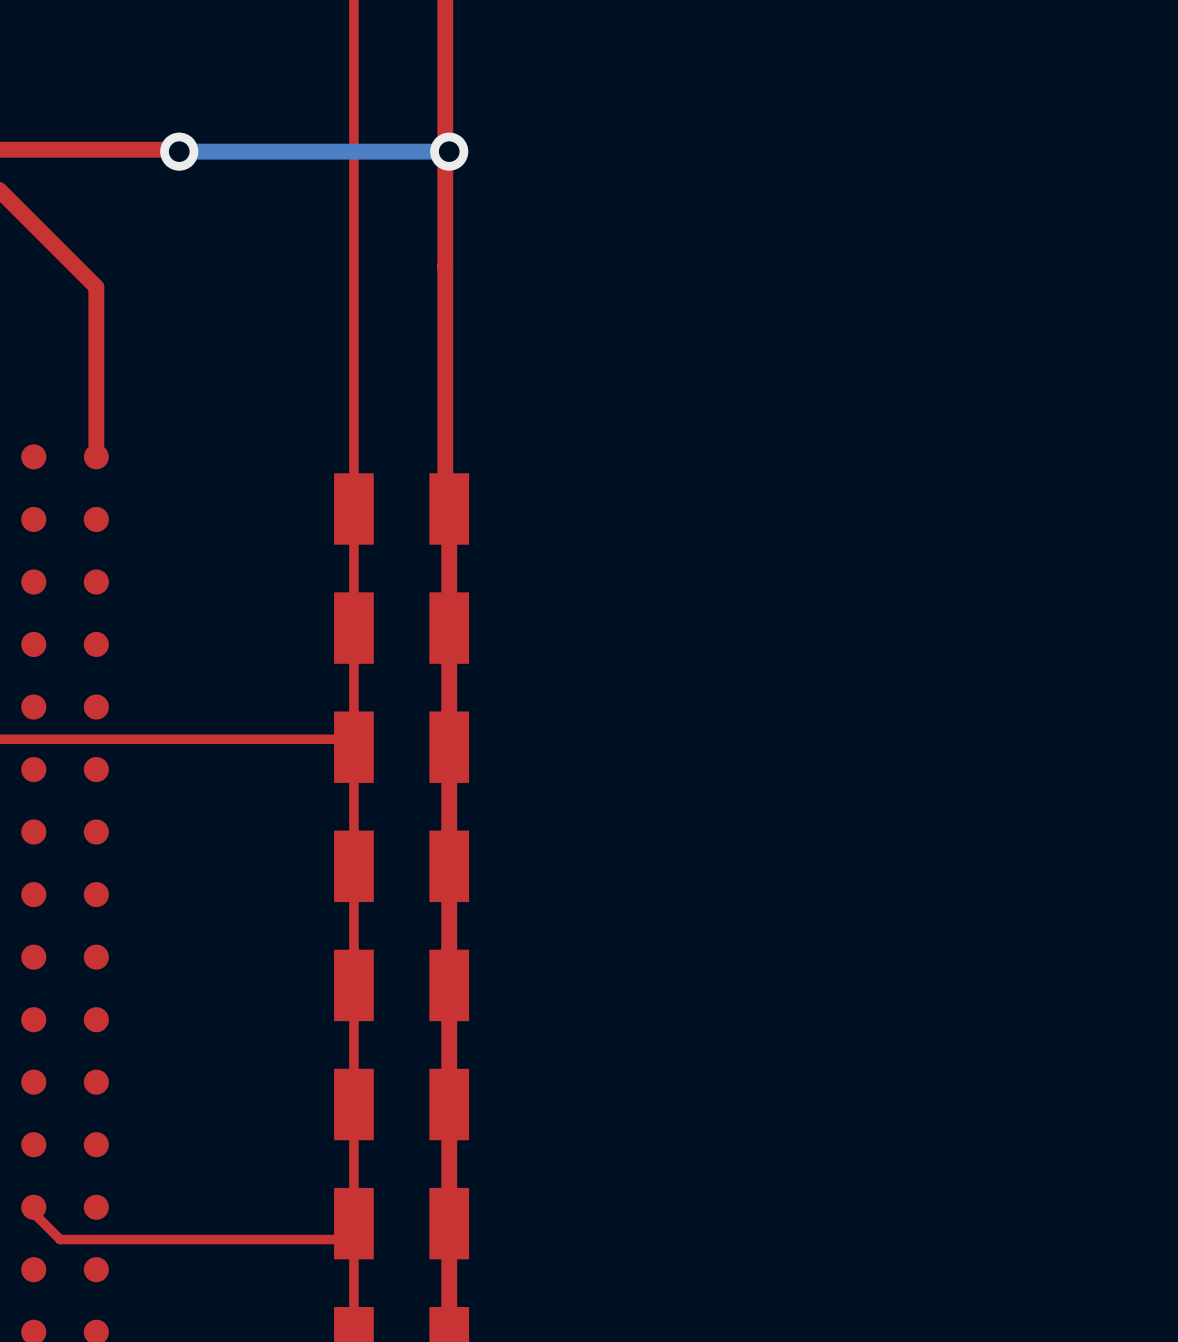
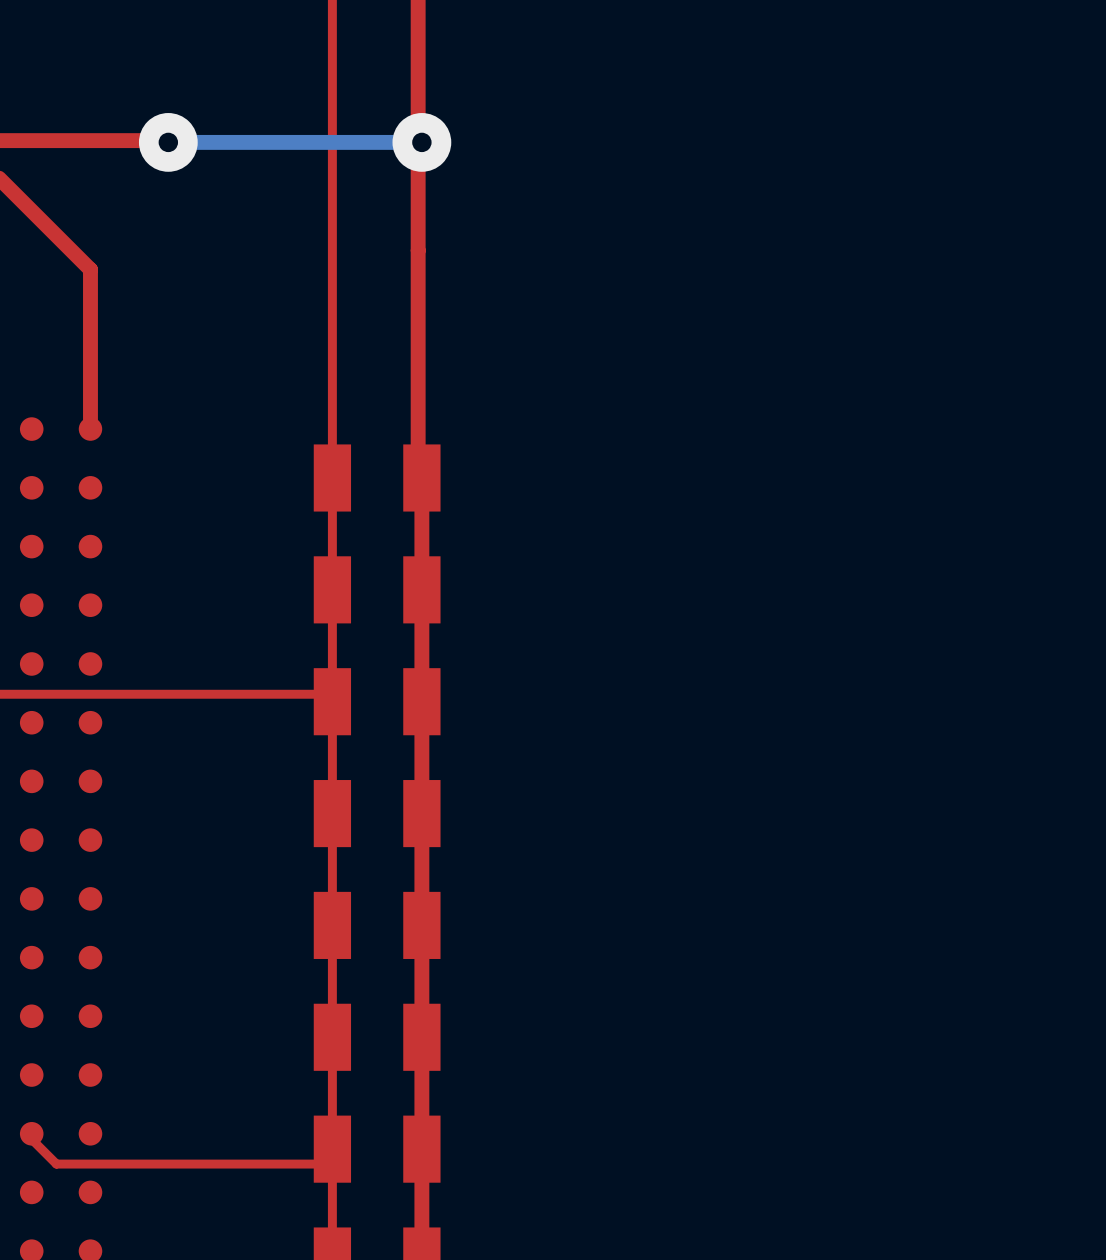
via size: [160, 132, 199, 171] -> [138, 113, 198, 172]
via size: [430, 132, 469, 171] -> [392, 113, 452, 172]

